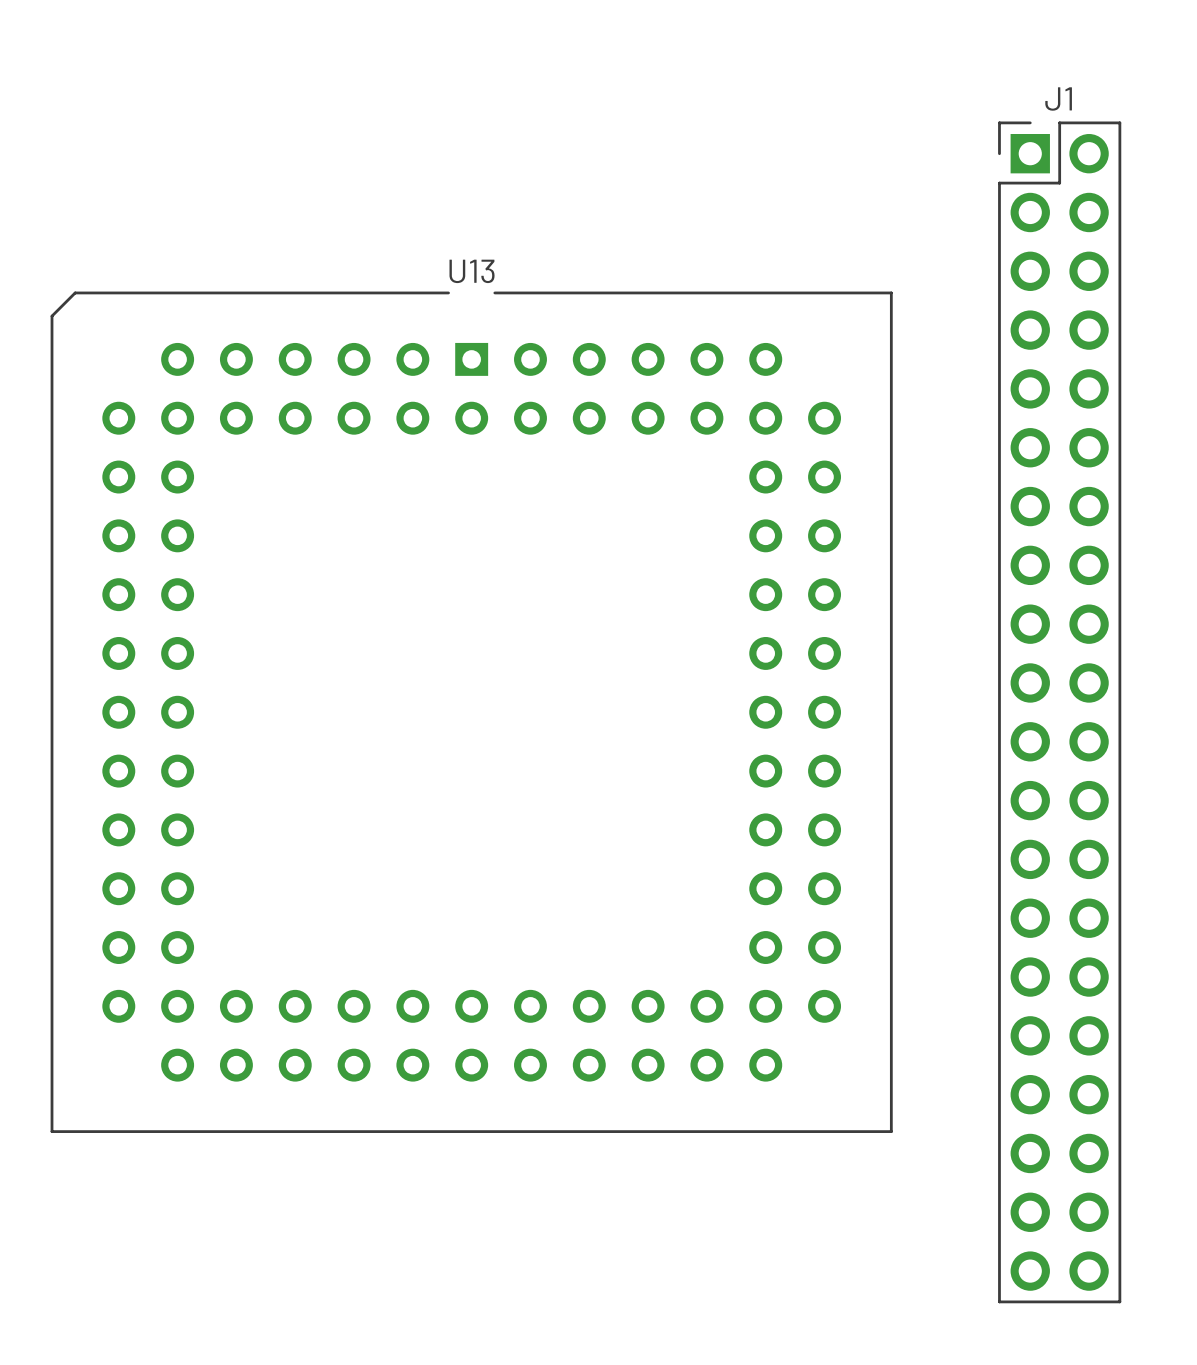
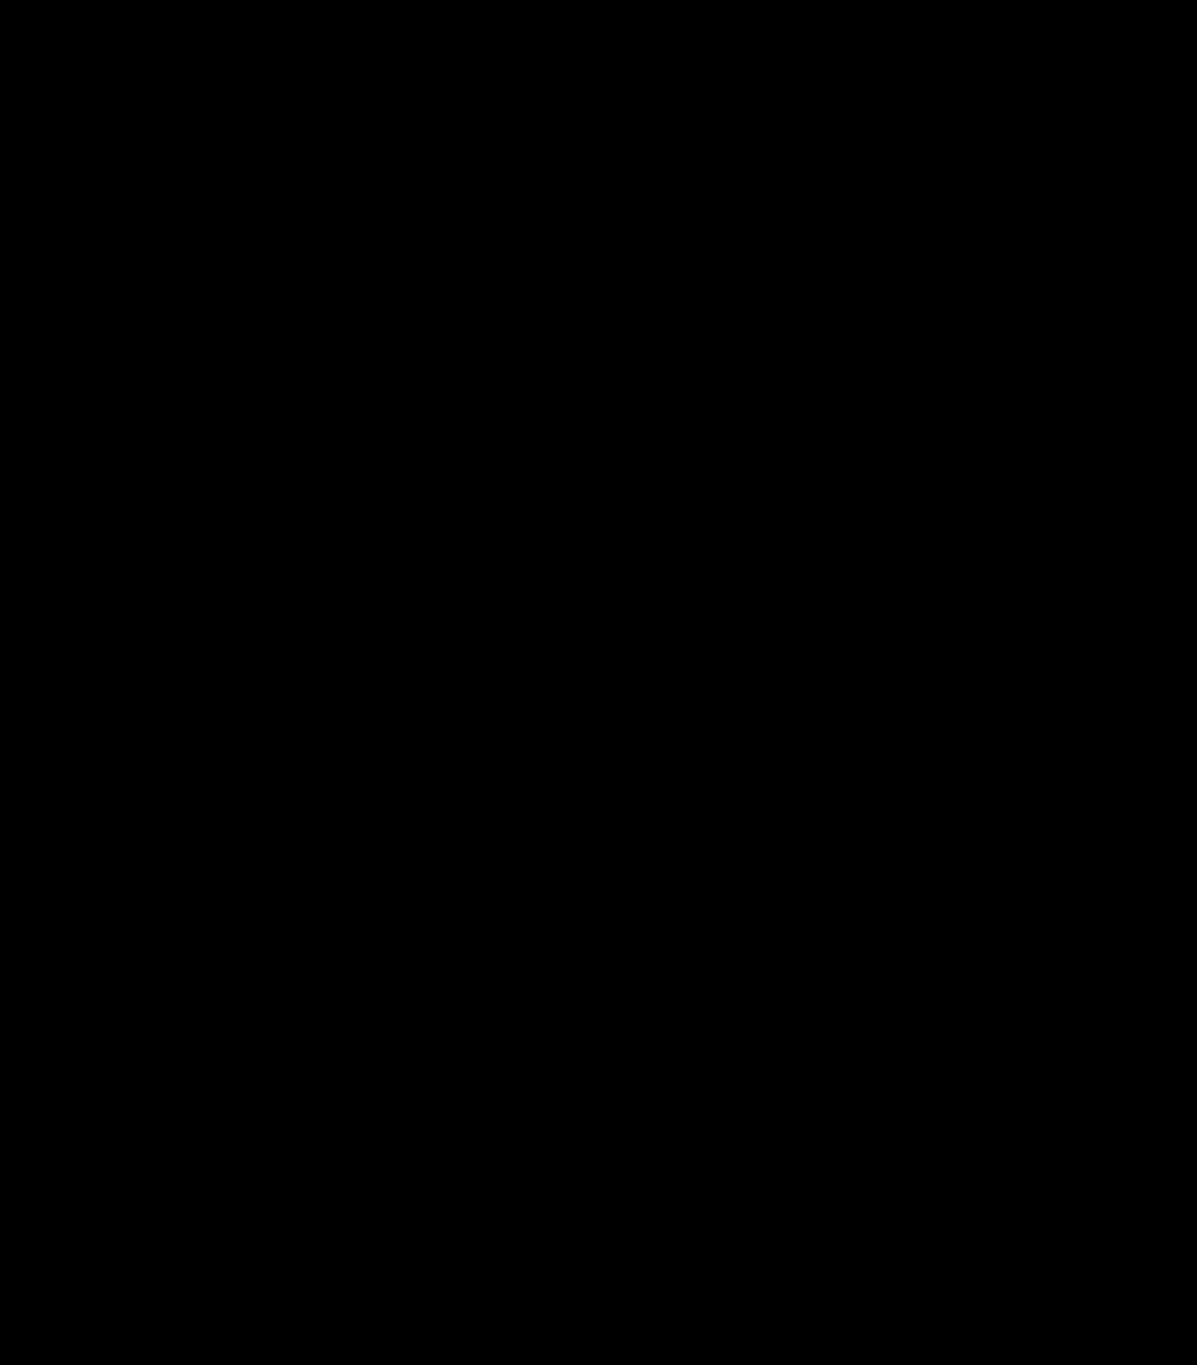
U13: (471, 712) -> none
J1: (1059, 712) -> none

